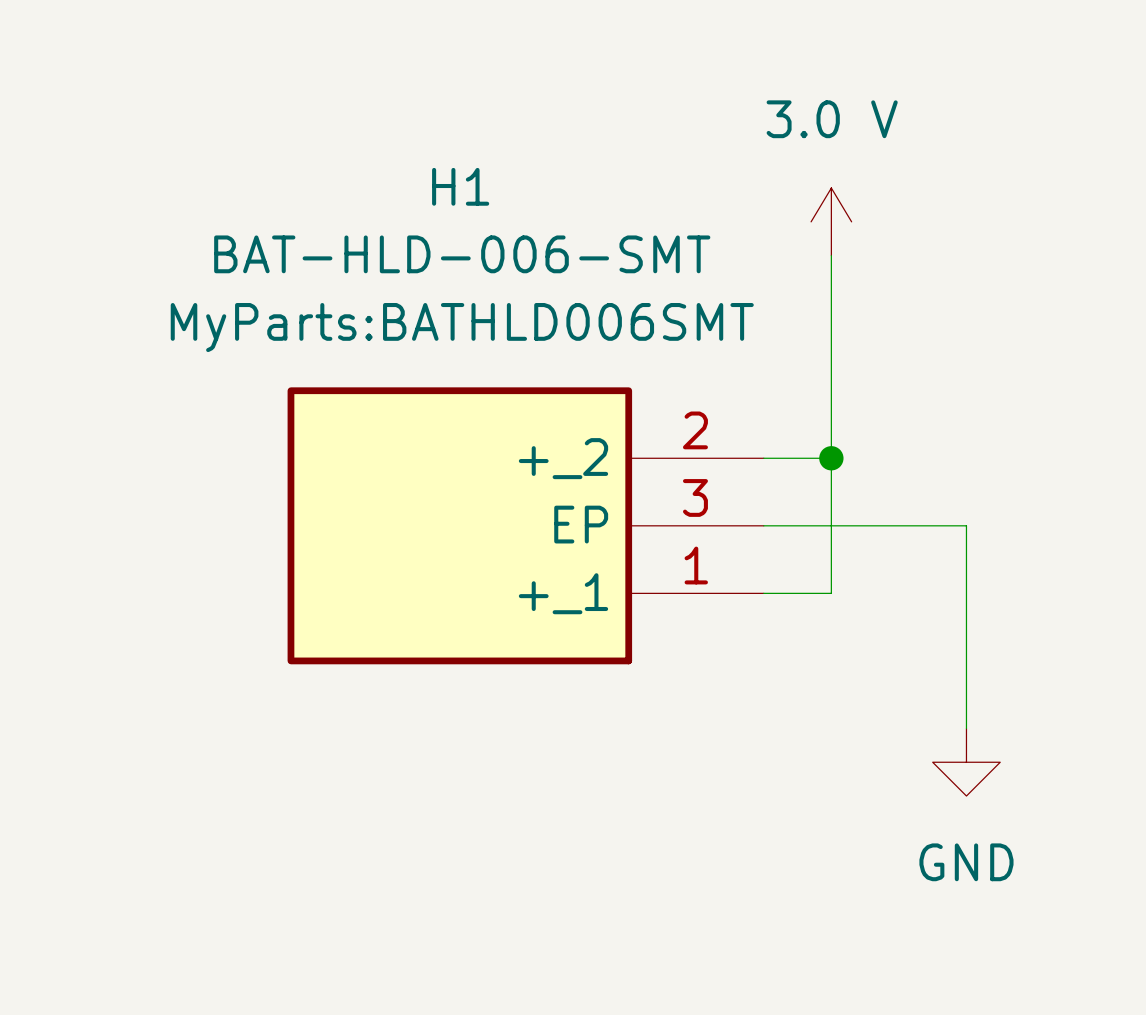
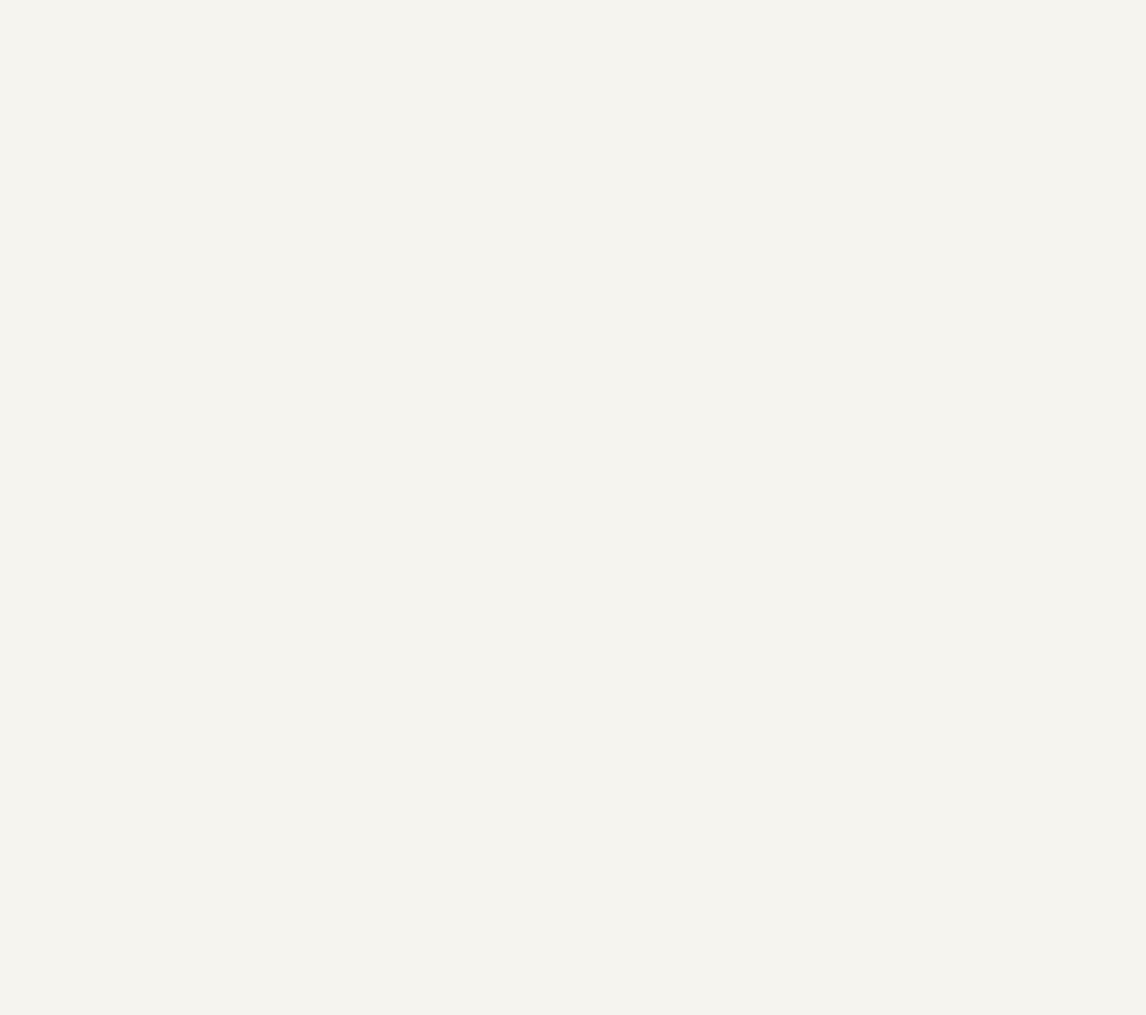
power symbol: 3.0 V (831, 221) -> none
wire: (831, 255) (831, 593) (763, 593) -> none
wire: (763, 458) (831, 458) -> none
junction: (831, 458) -> none
H1: BAT-HLD-006-SMT (525, 525) -> none
wire: (763, 525) (966, 525) (966, 728) -> none
power symbol: GND (966, 762) -> none

